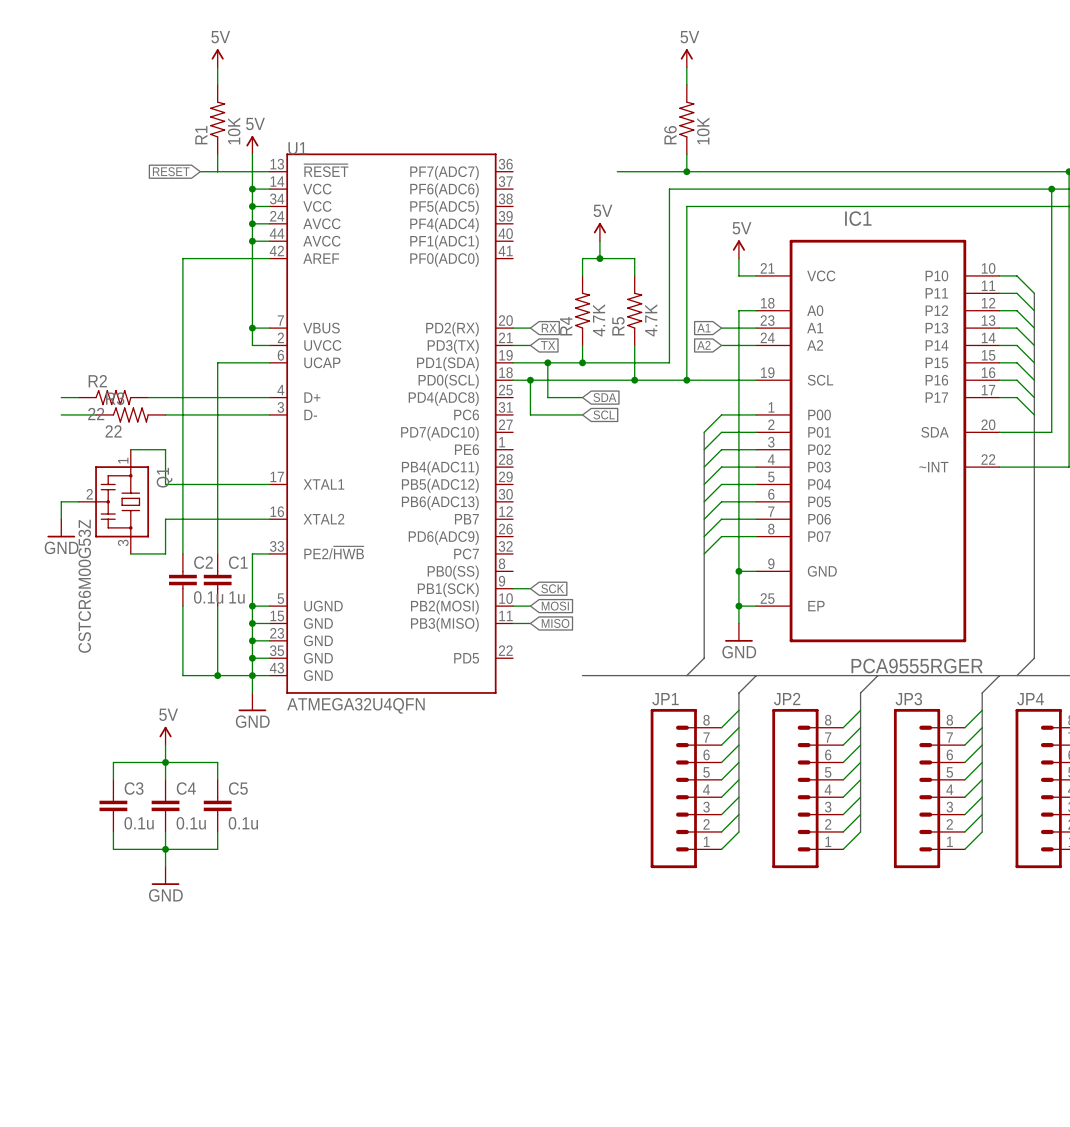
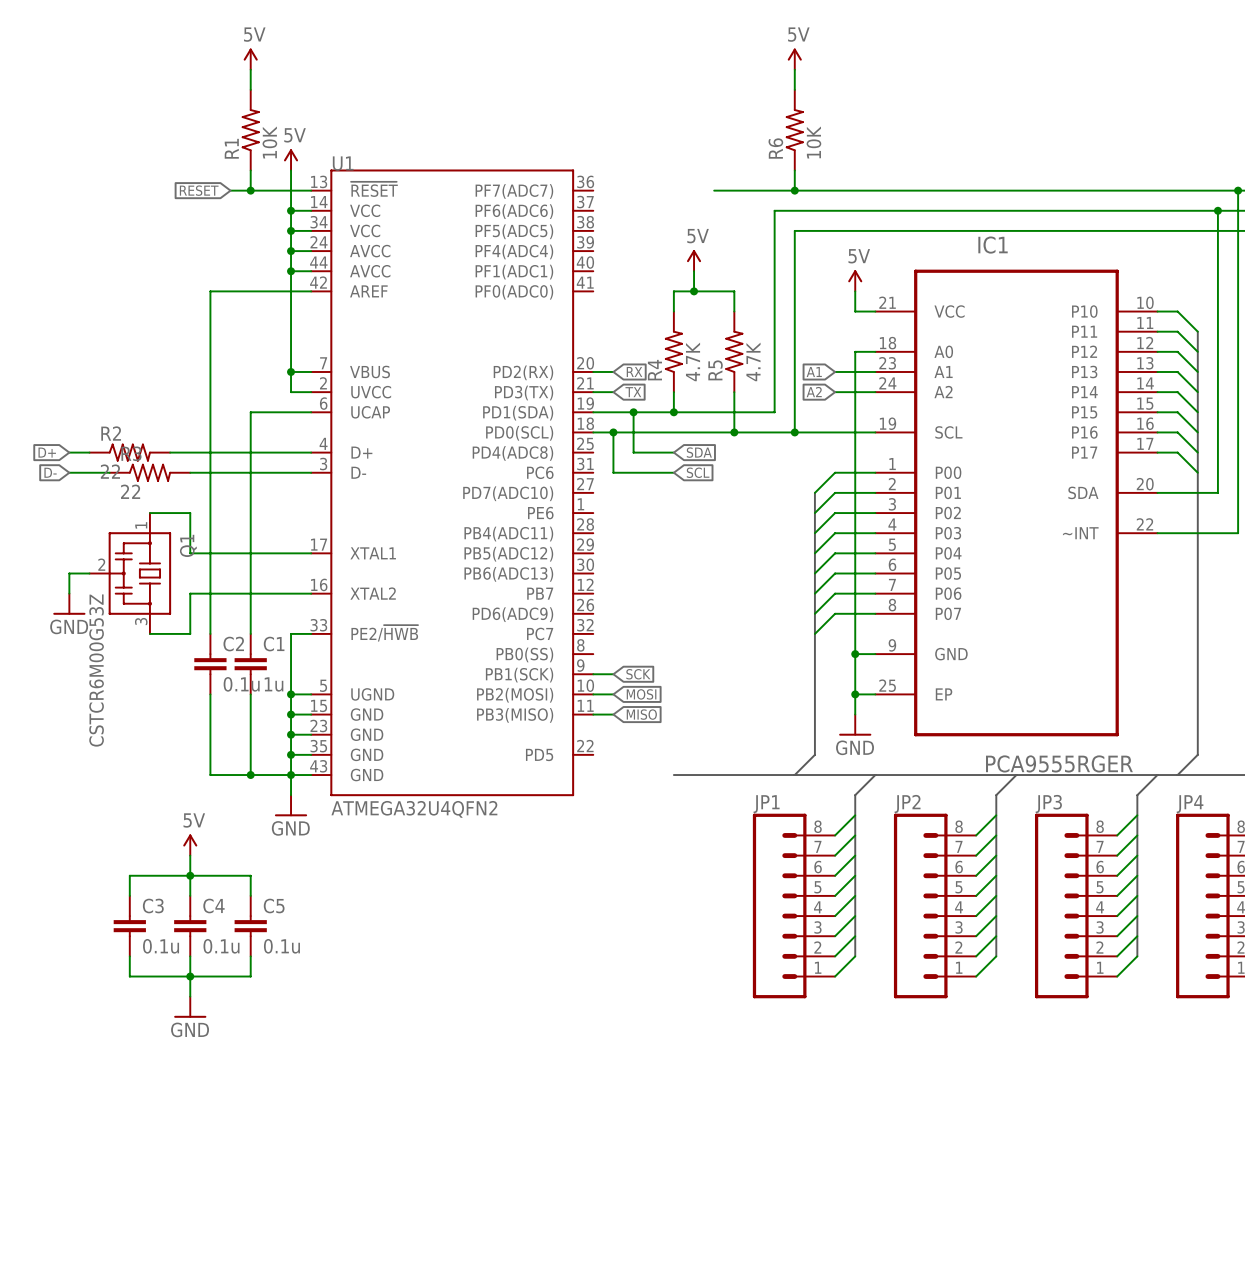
junction: none -> (250, 190)
global label: none -> D+ (47, 452)
global label: none -> D- (50, 472)
U1 value: ATMEGA32U4QFN (355, 705) -> ATMEGA32U4QFN2 (414, 809)

